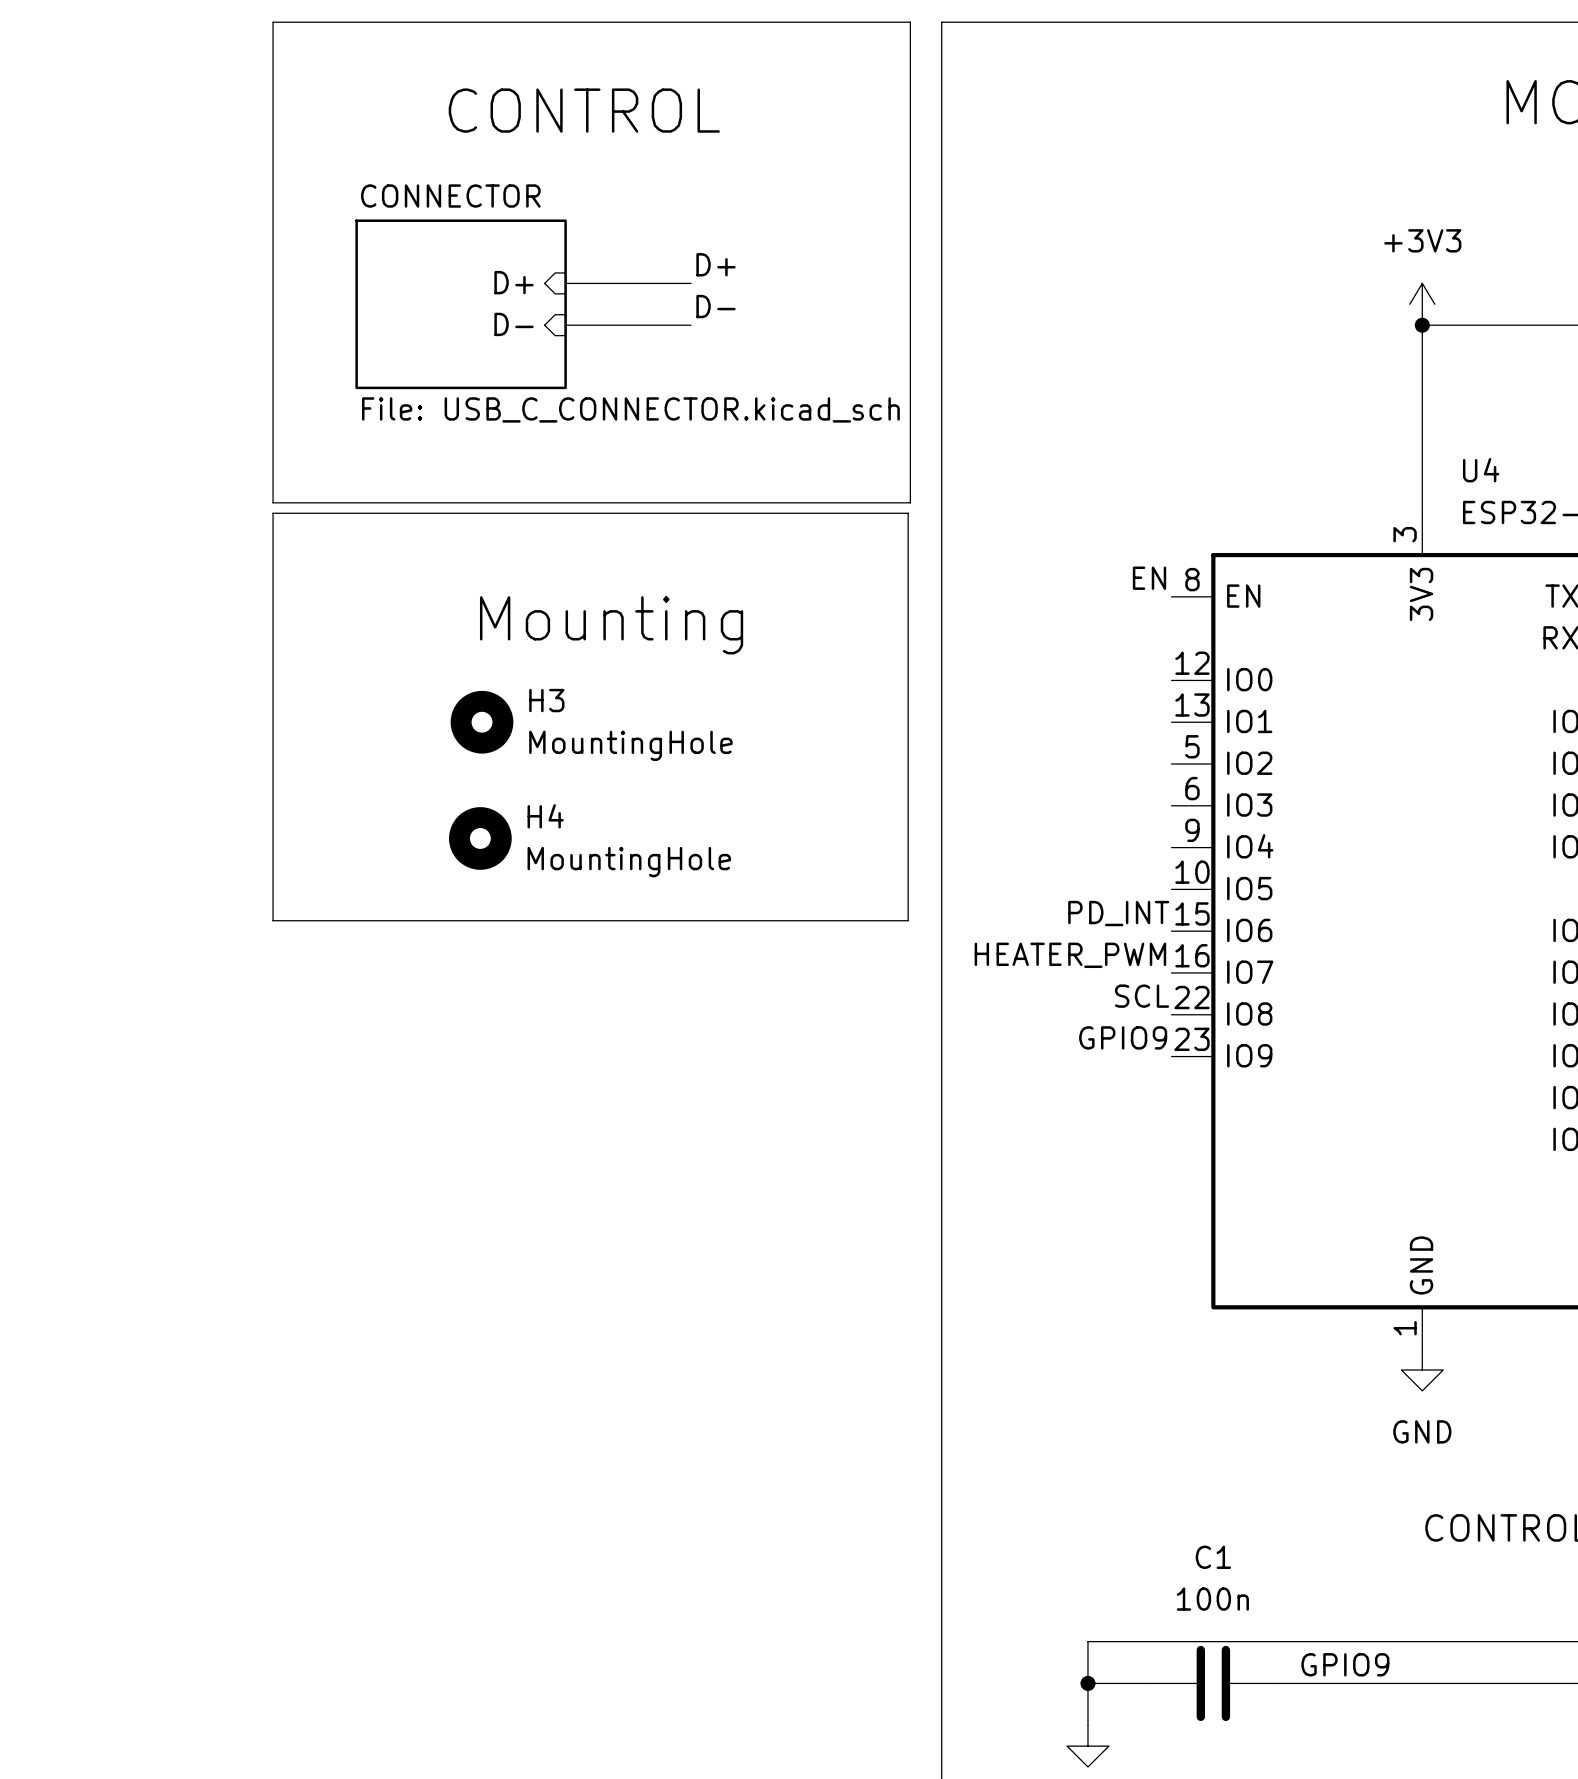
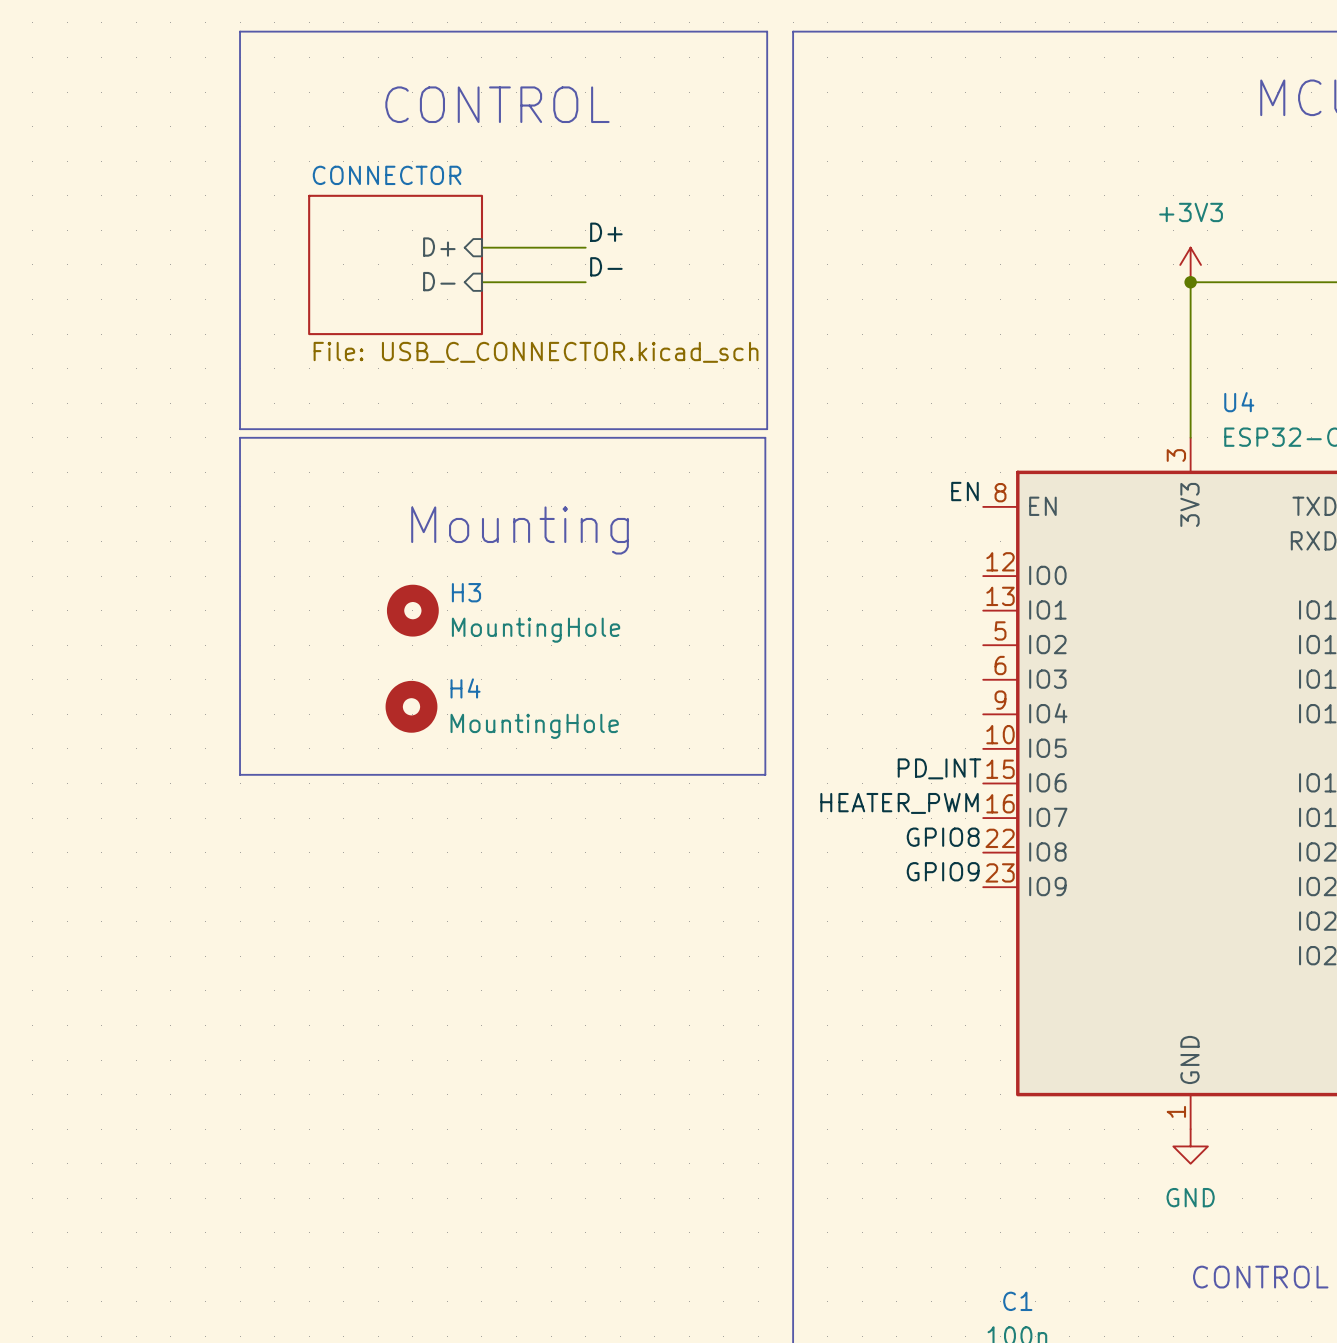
label: SCL (1142, 996) -> GPIO8 (943, 837)

